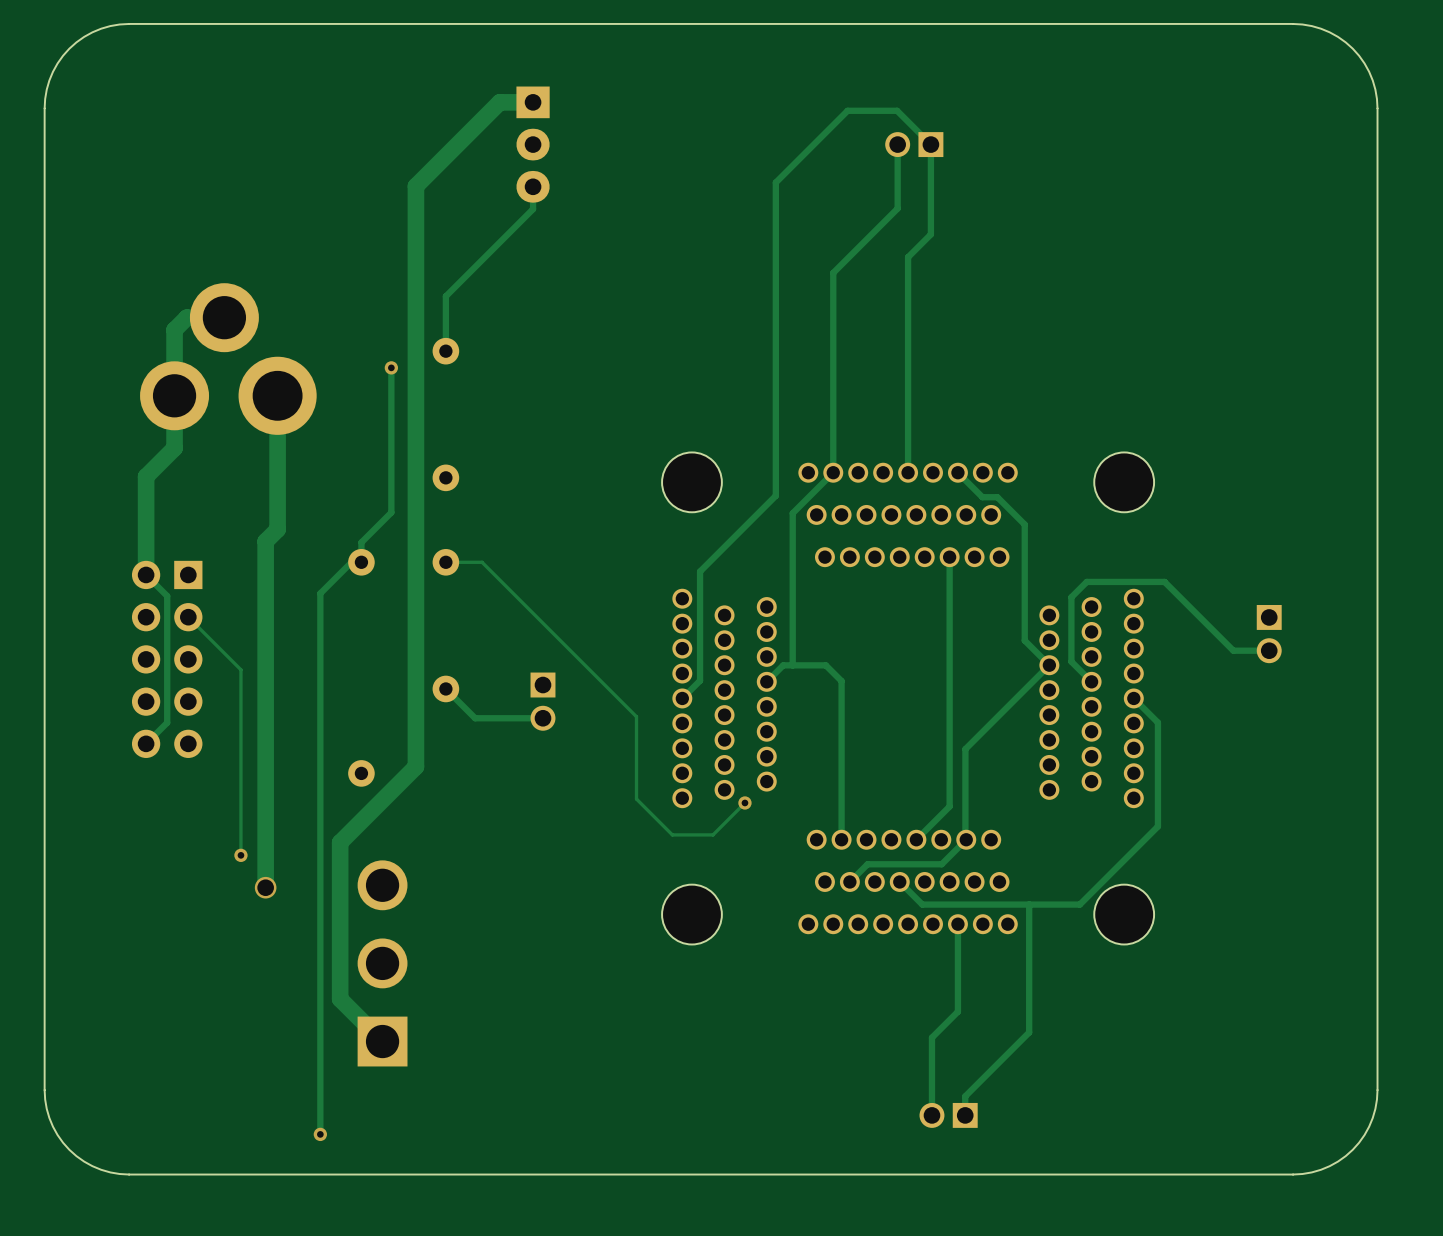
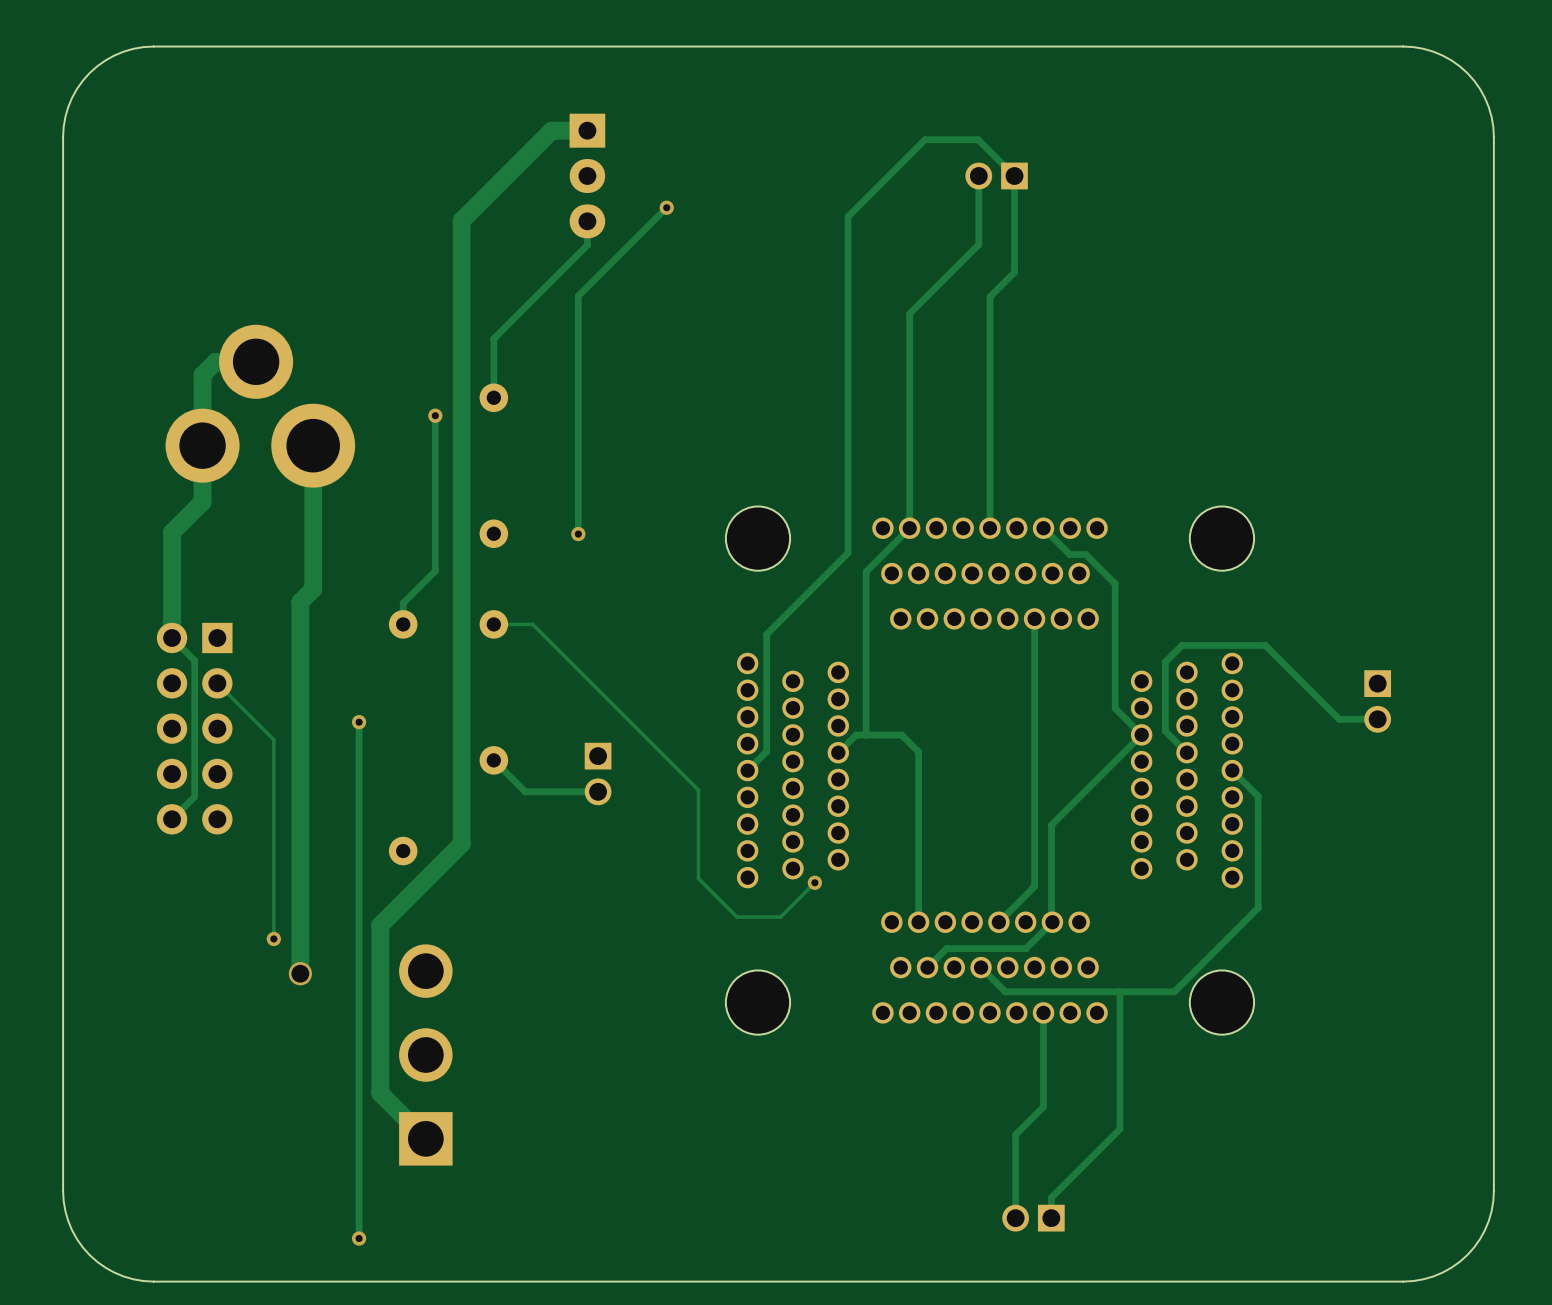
track: none -> (666, 207) (578, 296) (578, 534)
via: none -> (666, 207)
via: none -> (578, 534)
track: (361, 552) (320, 593) (320, 653) -> none
via: none -> (359, 722)

